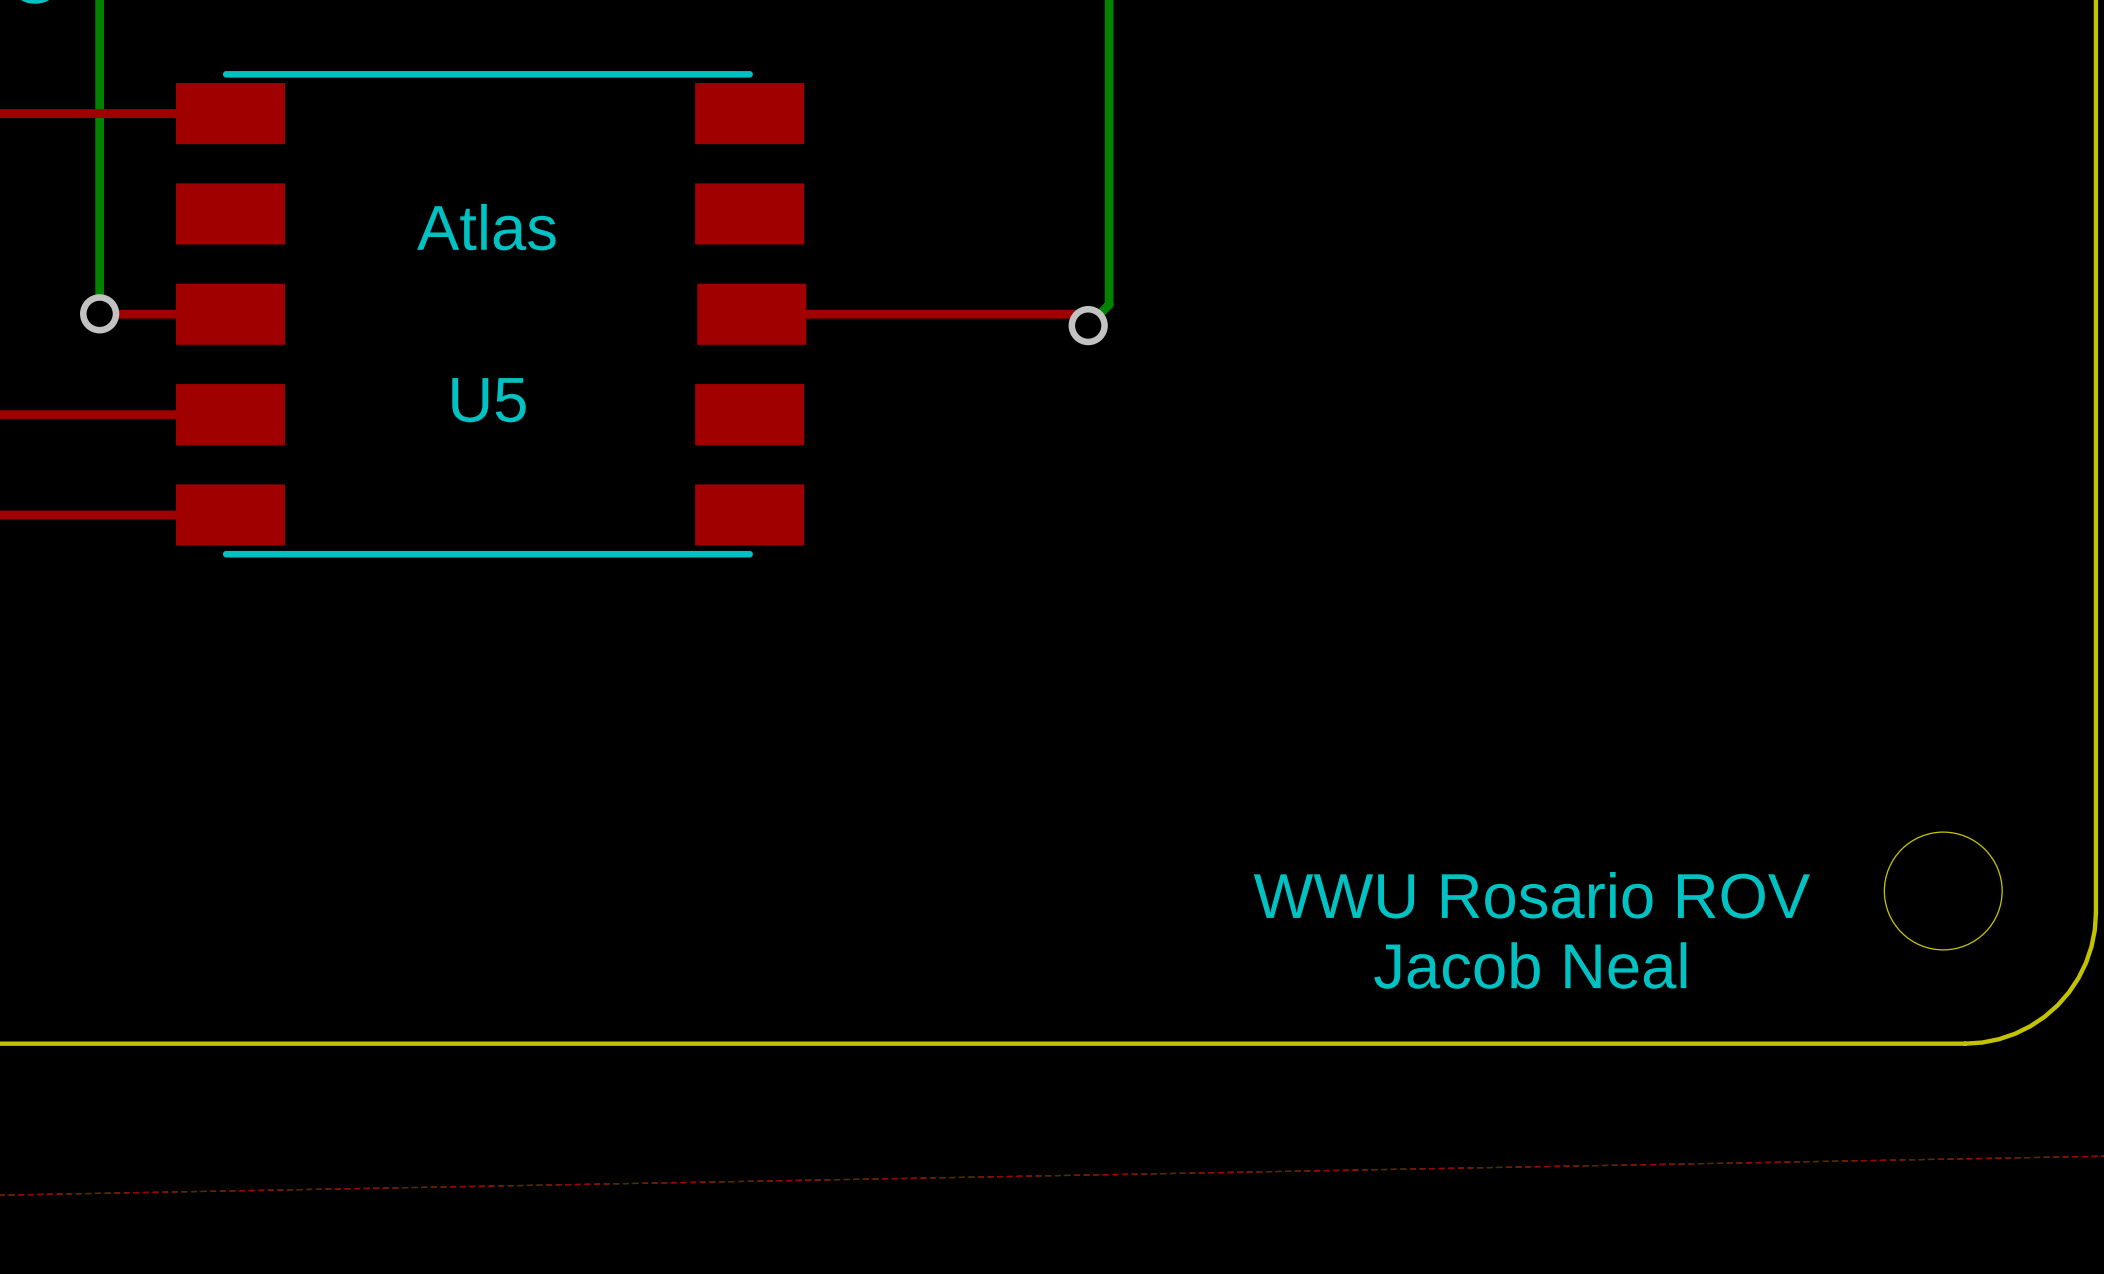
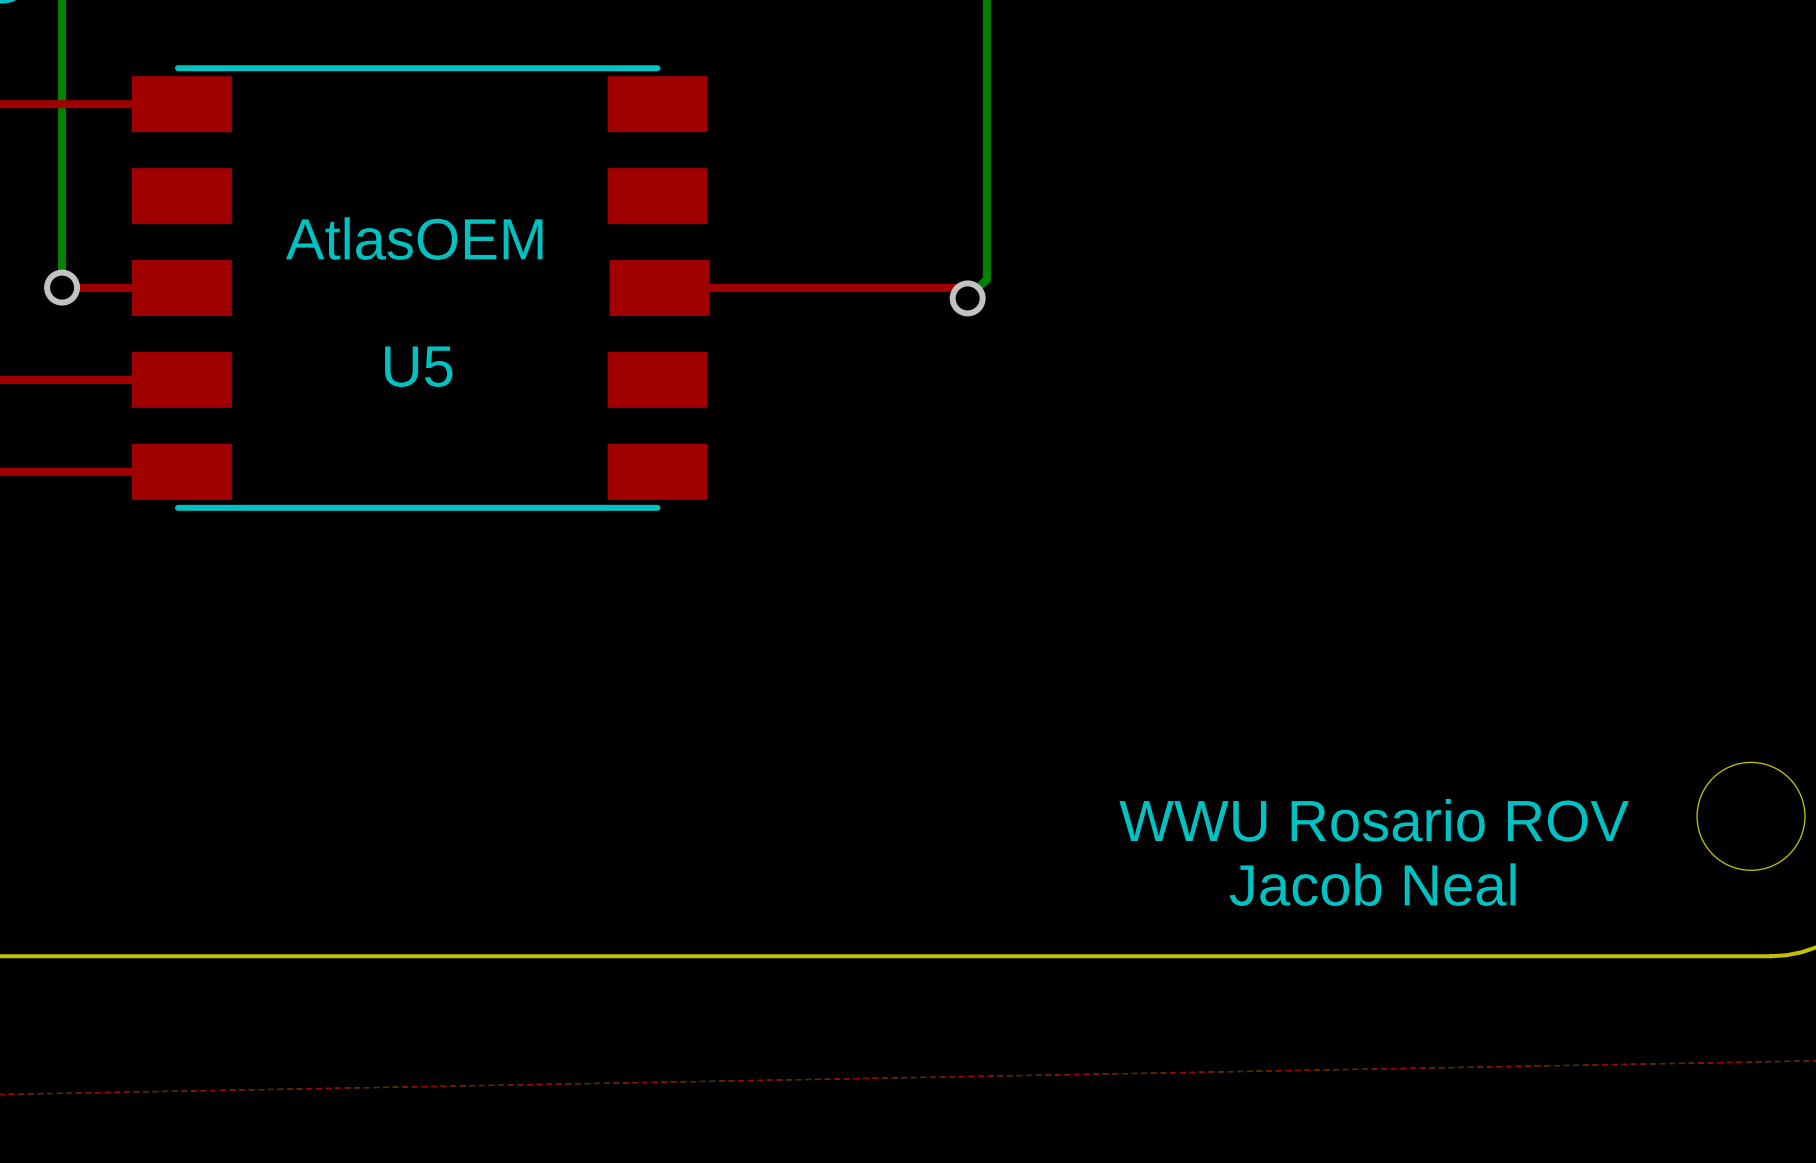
text: Atlas (486, 227) -> none
U5 value: none -> AtlasOEM (414, 238)

